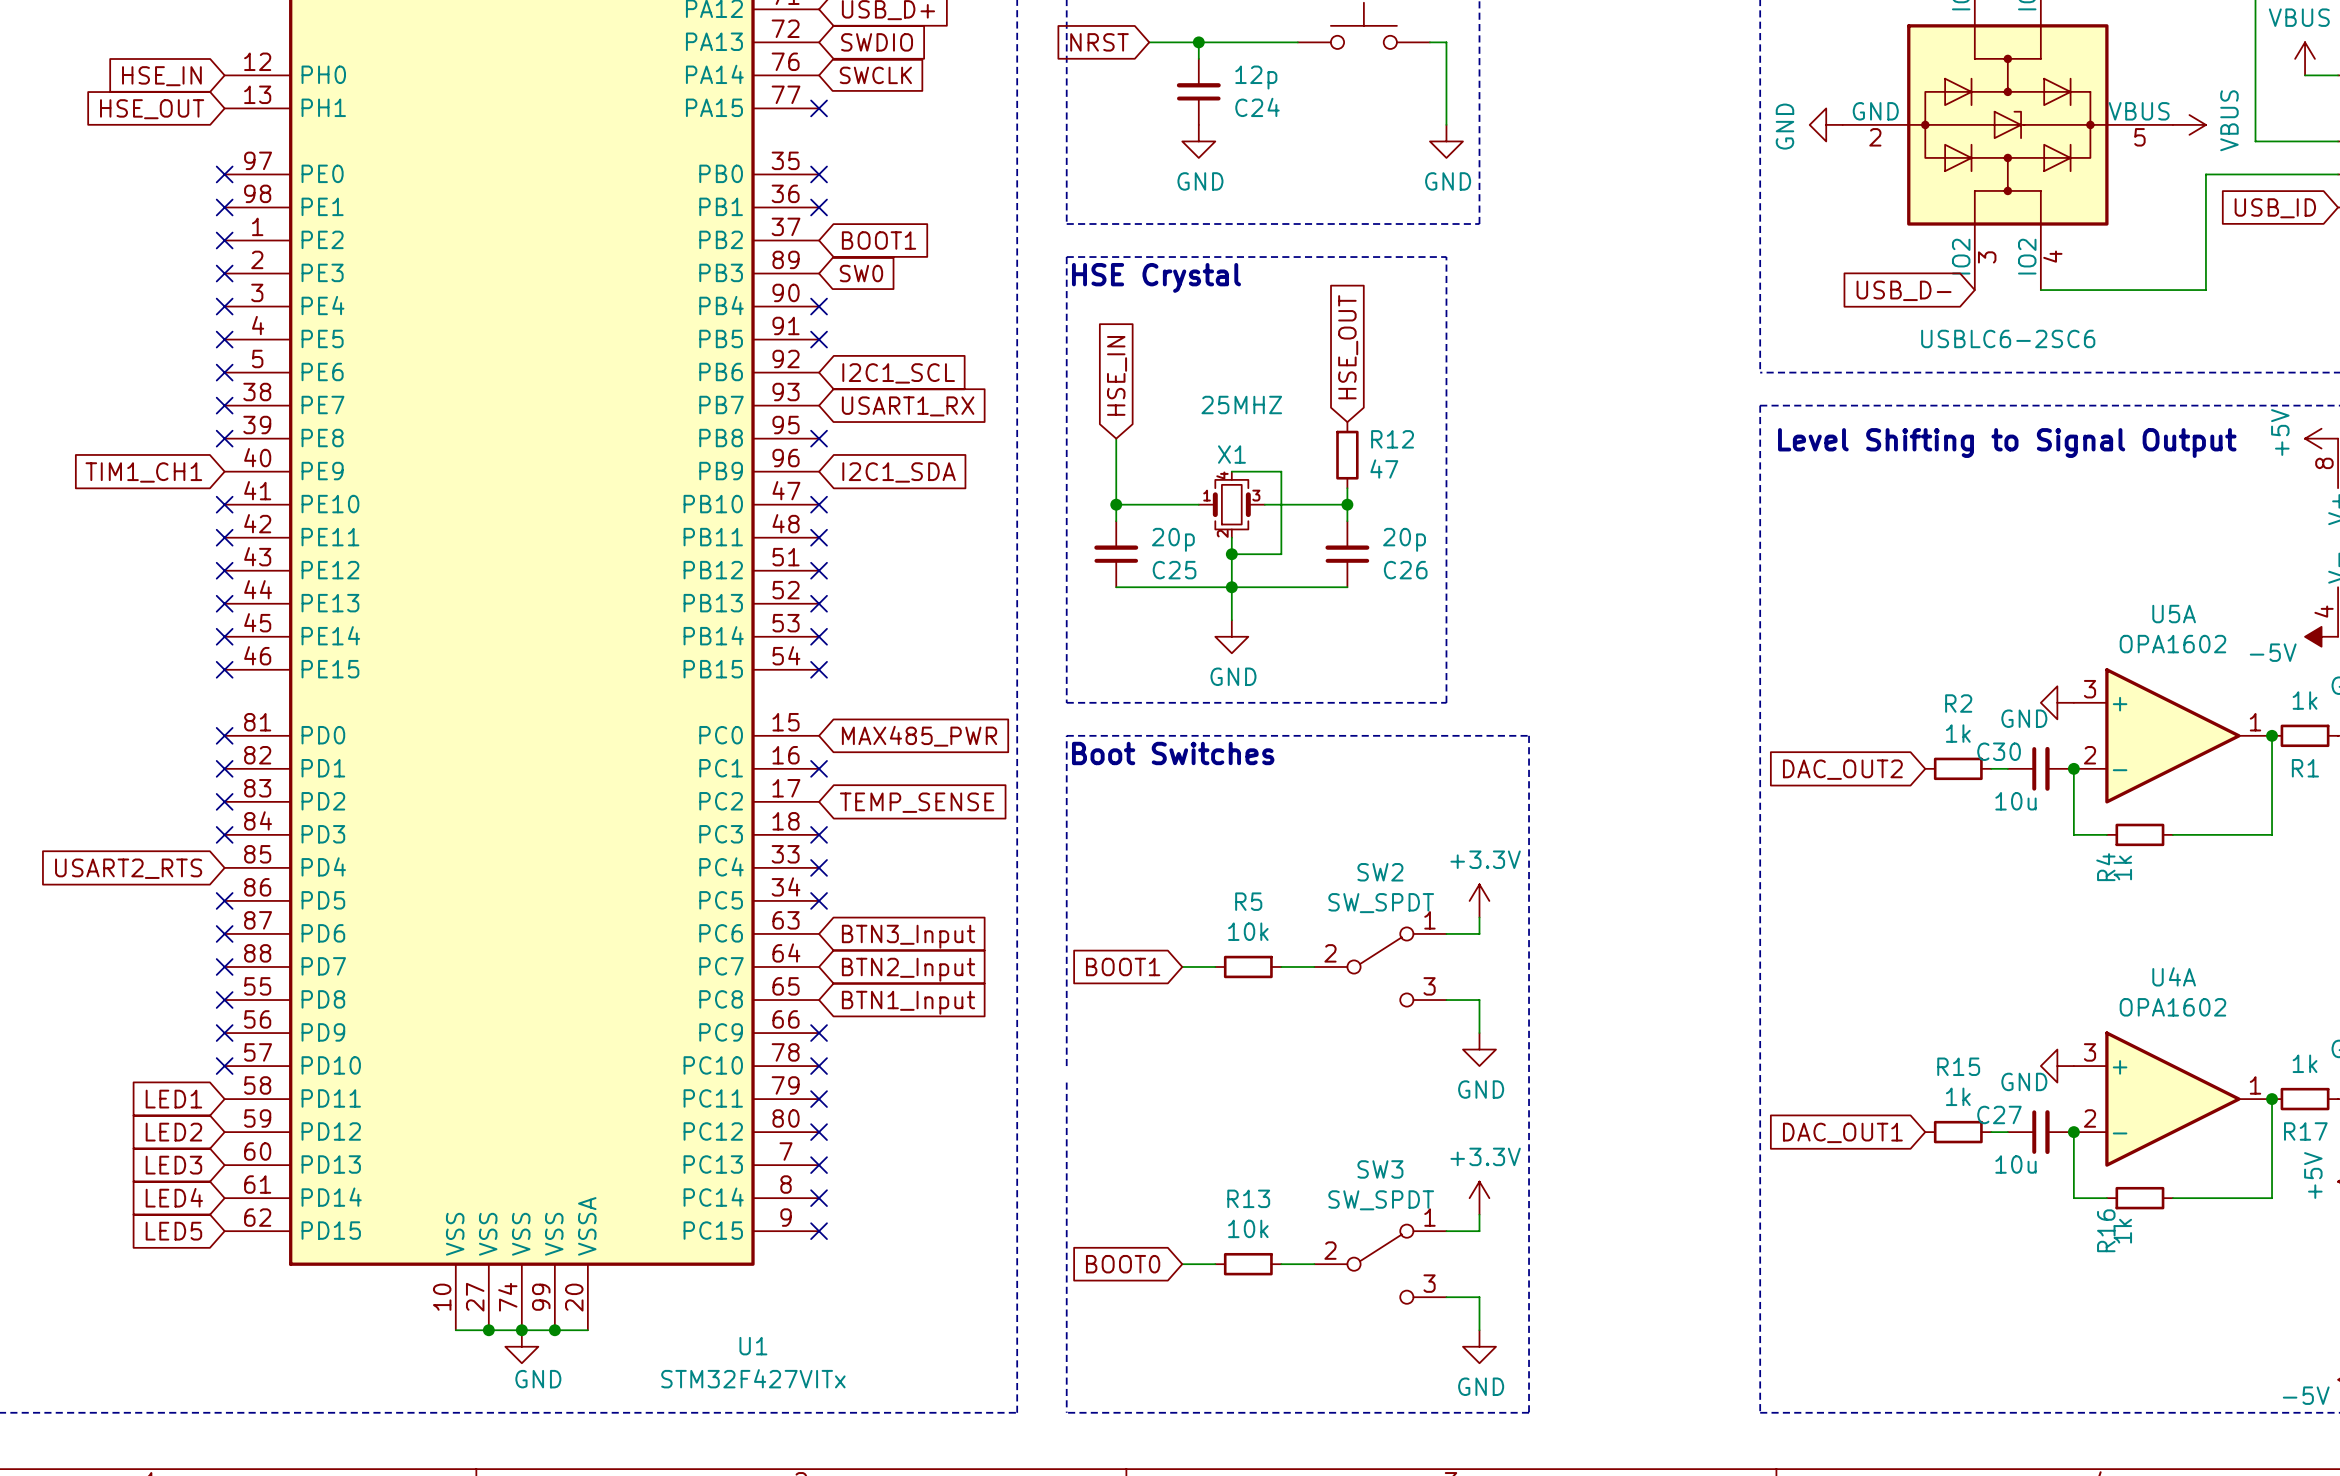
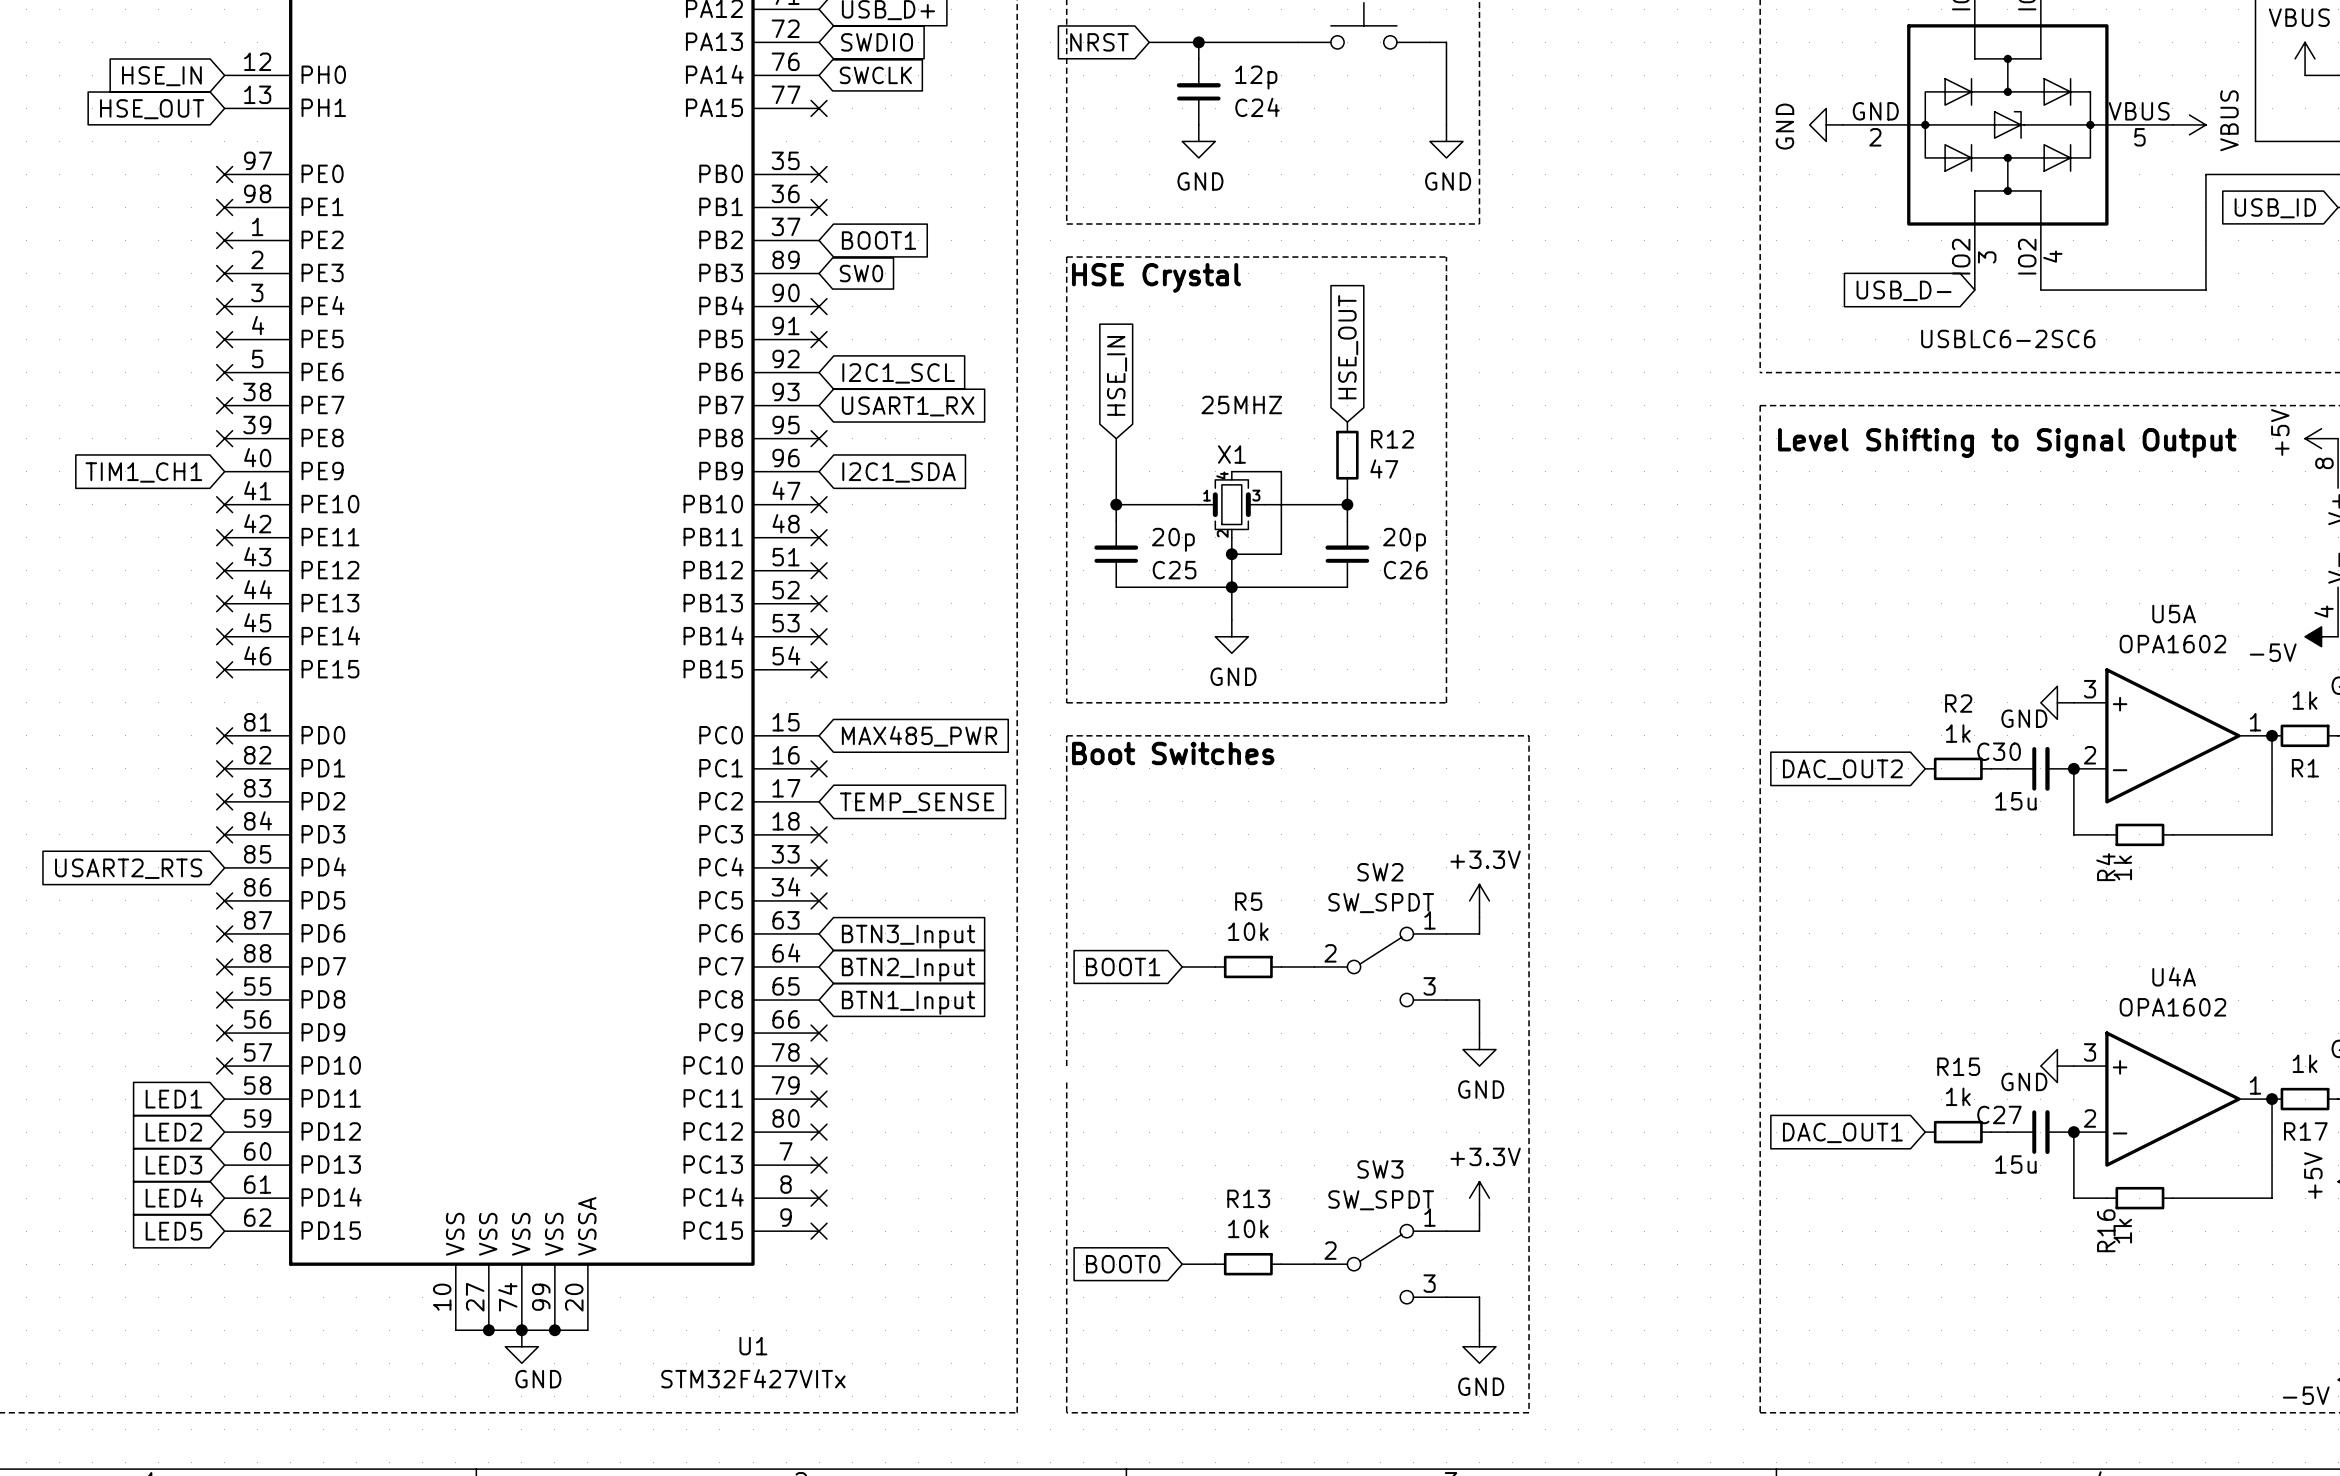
C30 value: 10u (2015, 801) -> 15u (2015, 801)
C27 value: 10u (2015, 1164) -> 15u (2015, 1164)

